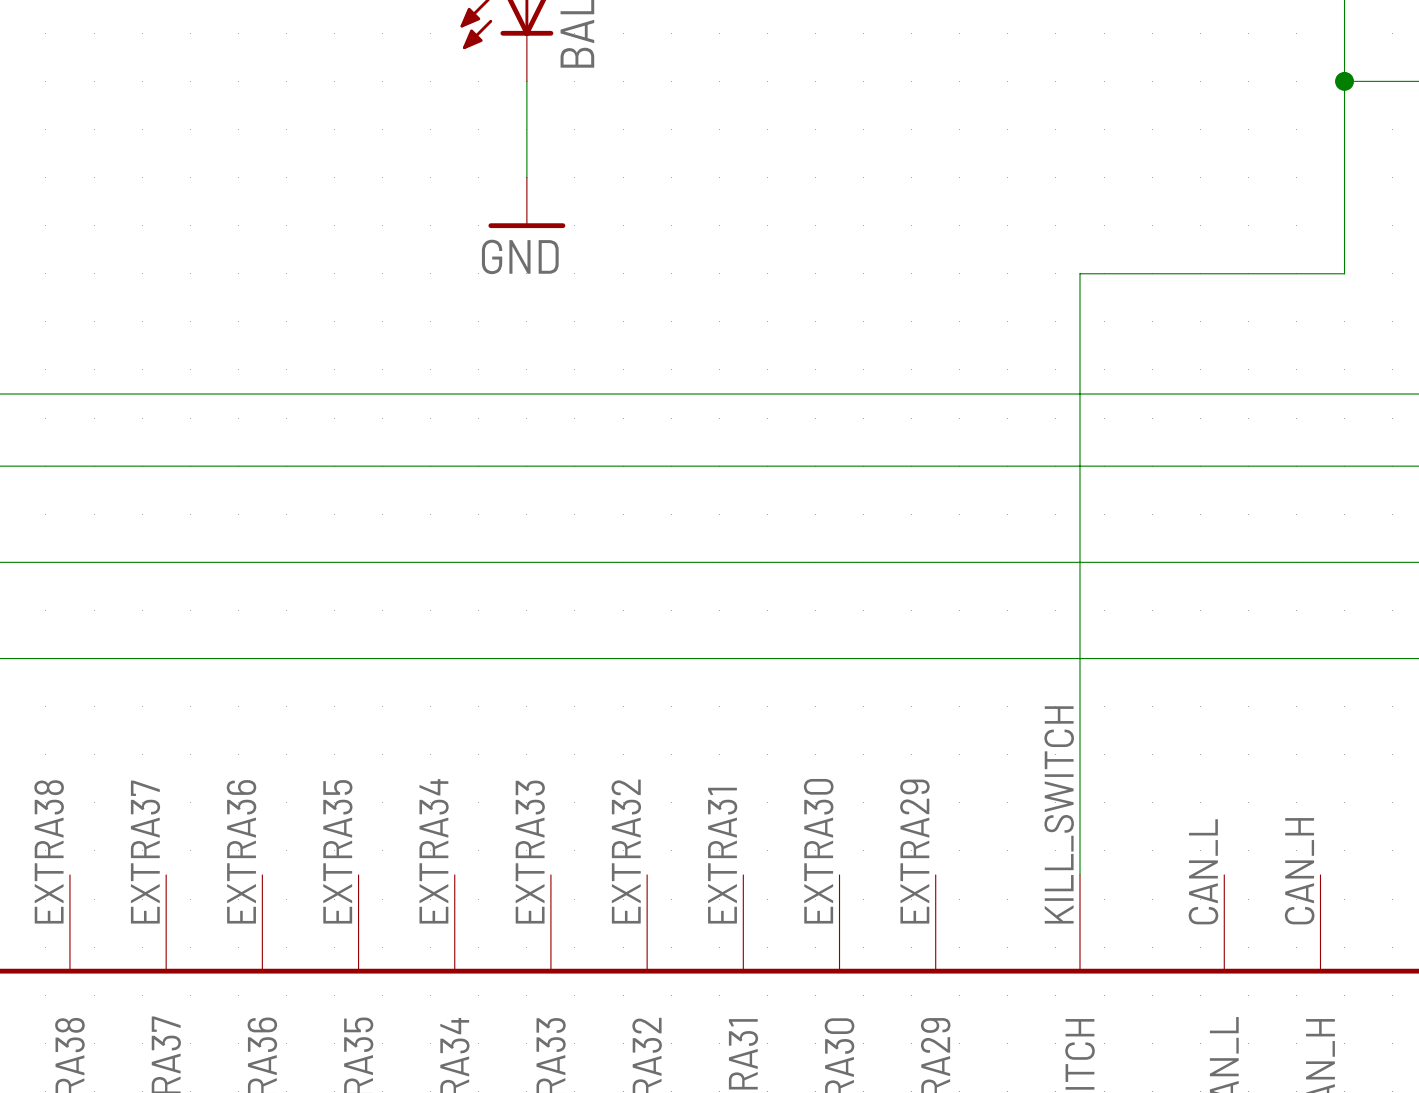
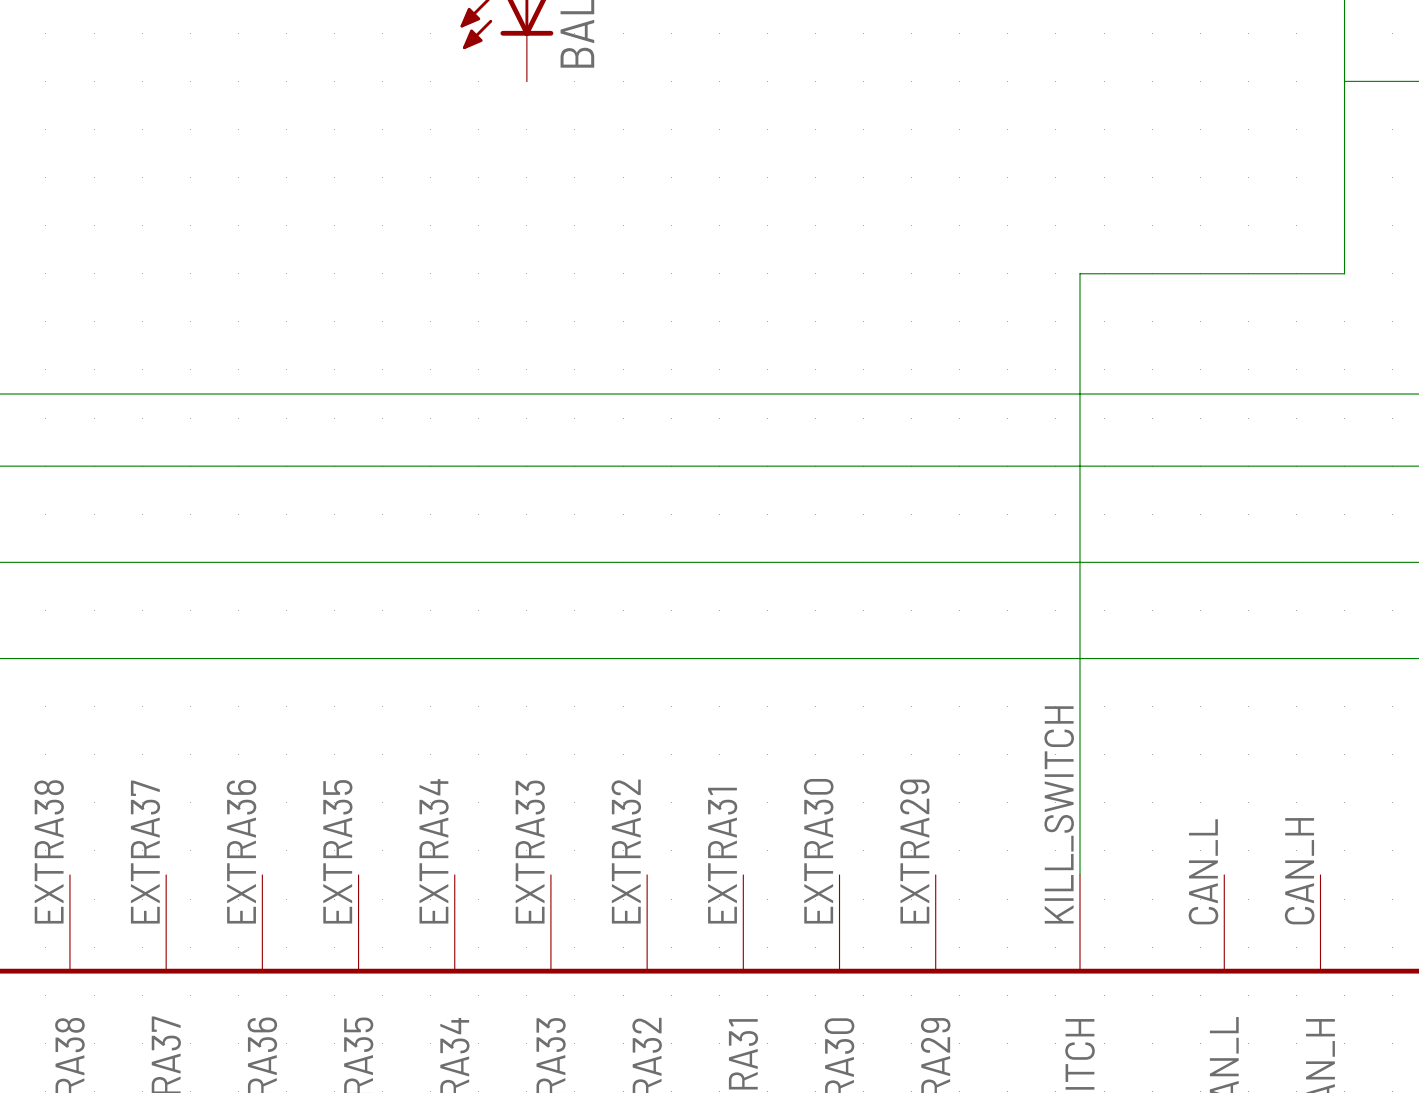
wire: (526, 81) (526, 177) -> none
junction: (1344, 81) -> none
power symbol: GND (526, 202) -> none

